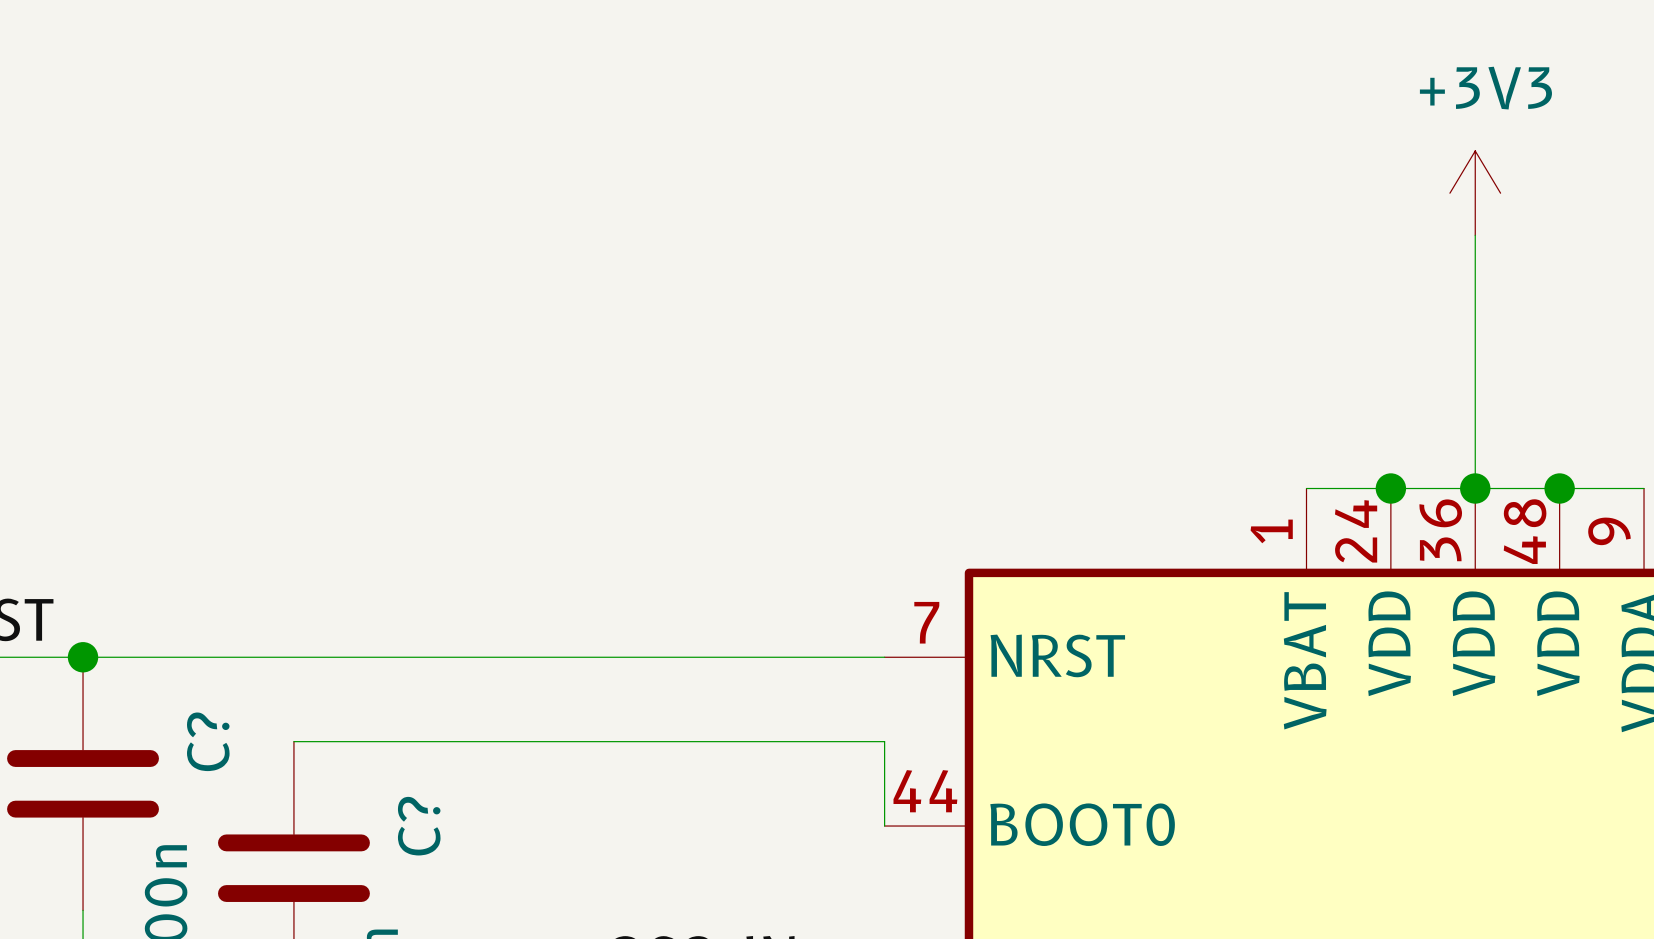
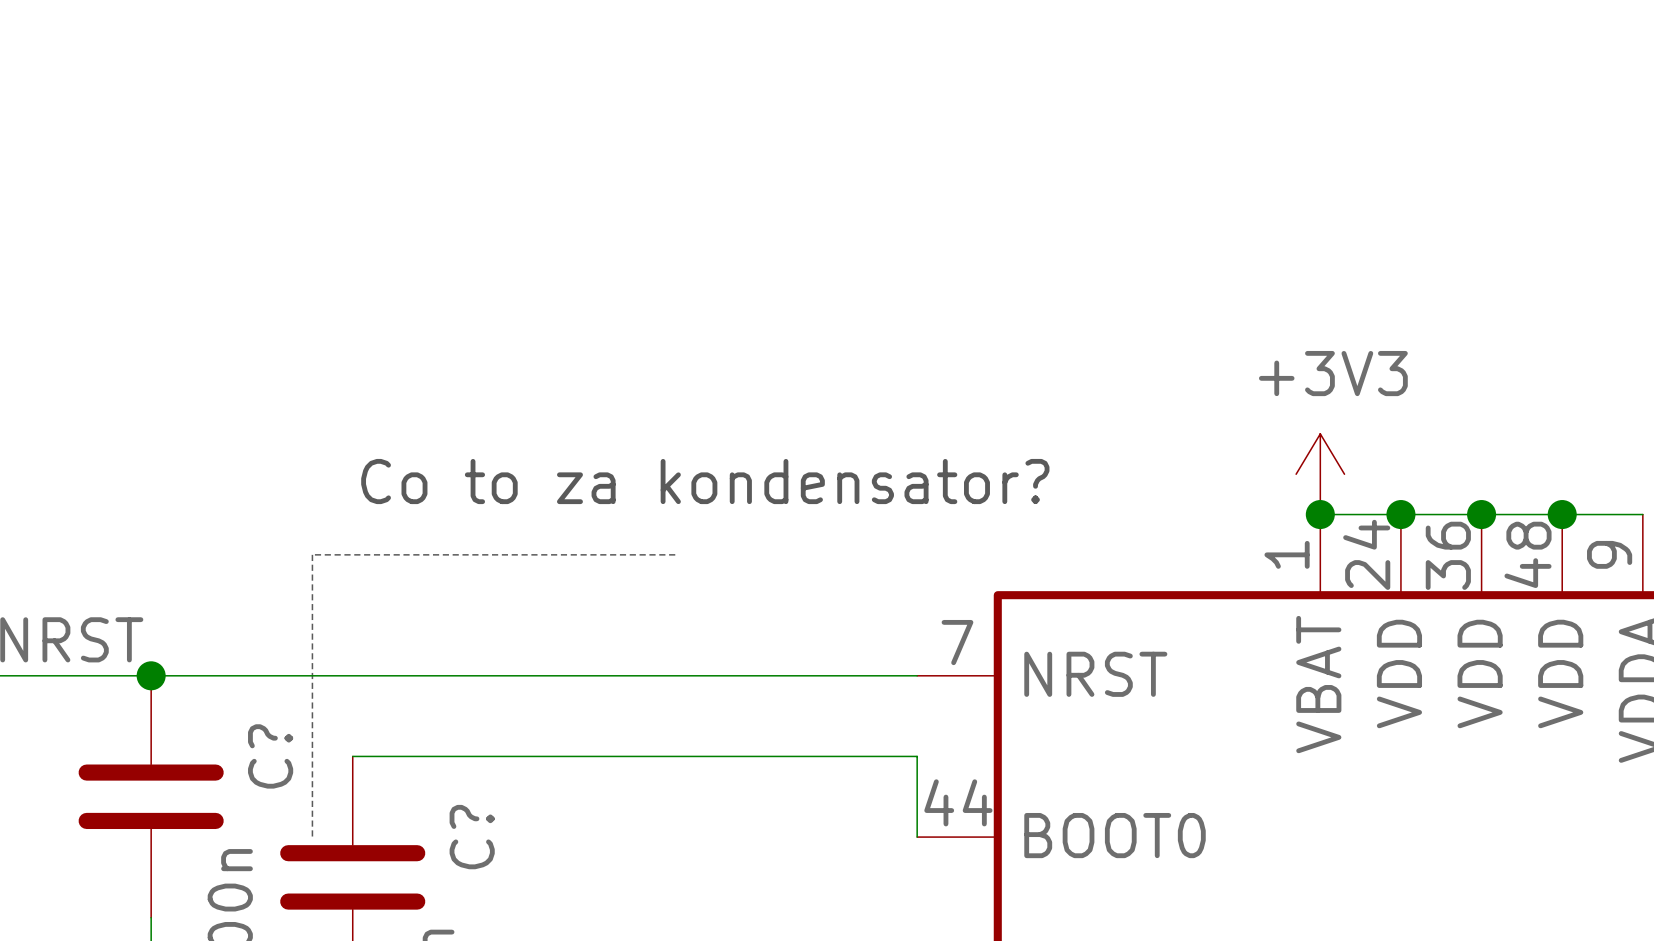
power symbol position: +3V3 (1475, 193) -> +3V3 (1320, 474)
wire: (1475, 235) (1475, 488) -> none
text: none -> Co to za kondensator? (705, 481)
junction: none -> (1320, 514)
line: none -> (675, 554) (312, 554) (312, 837)

